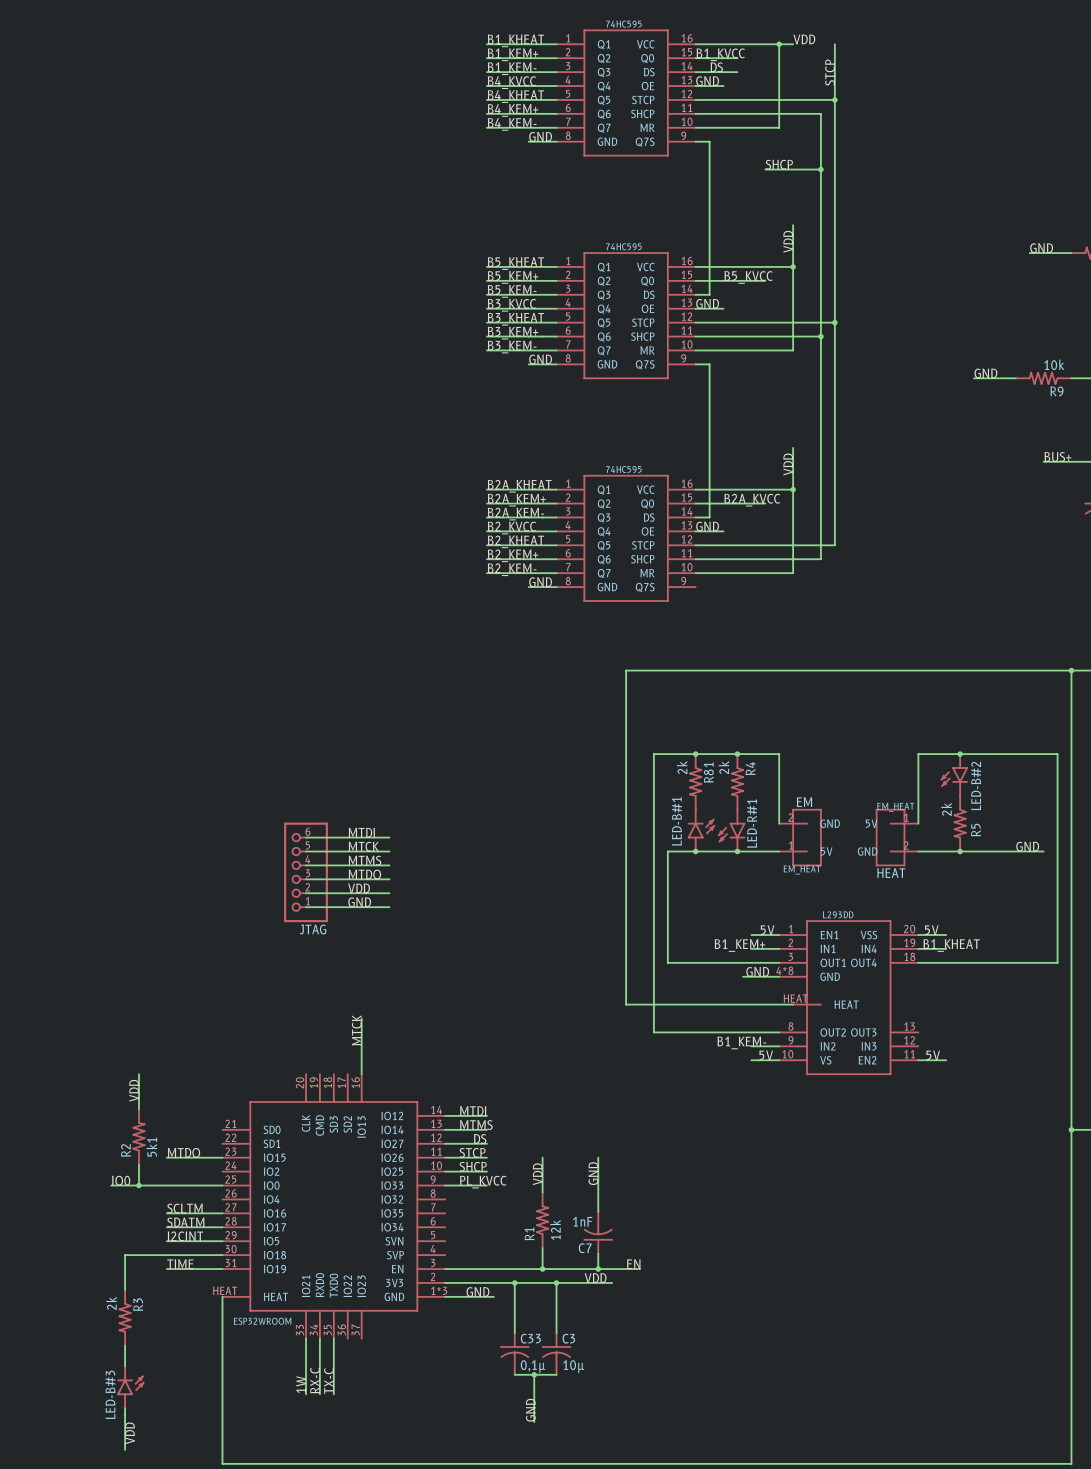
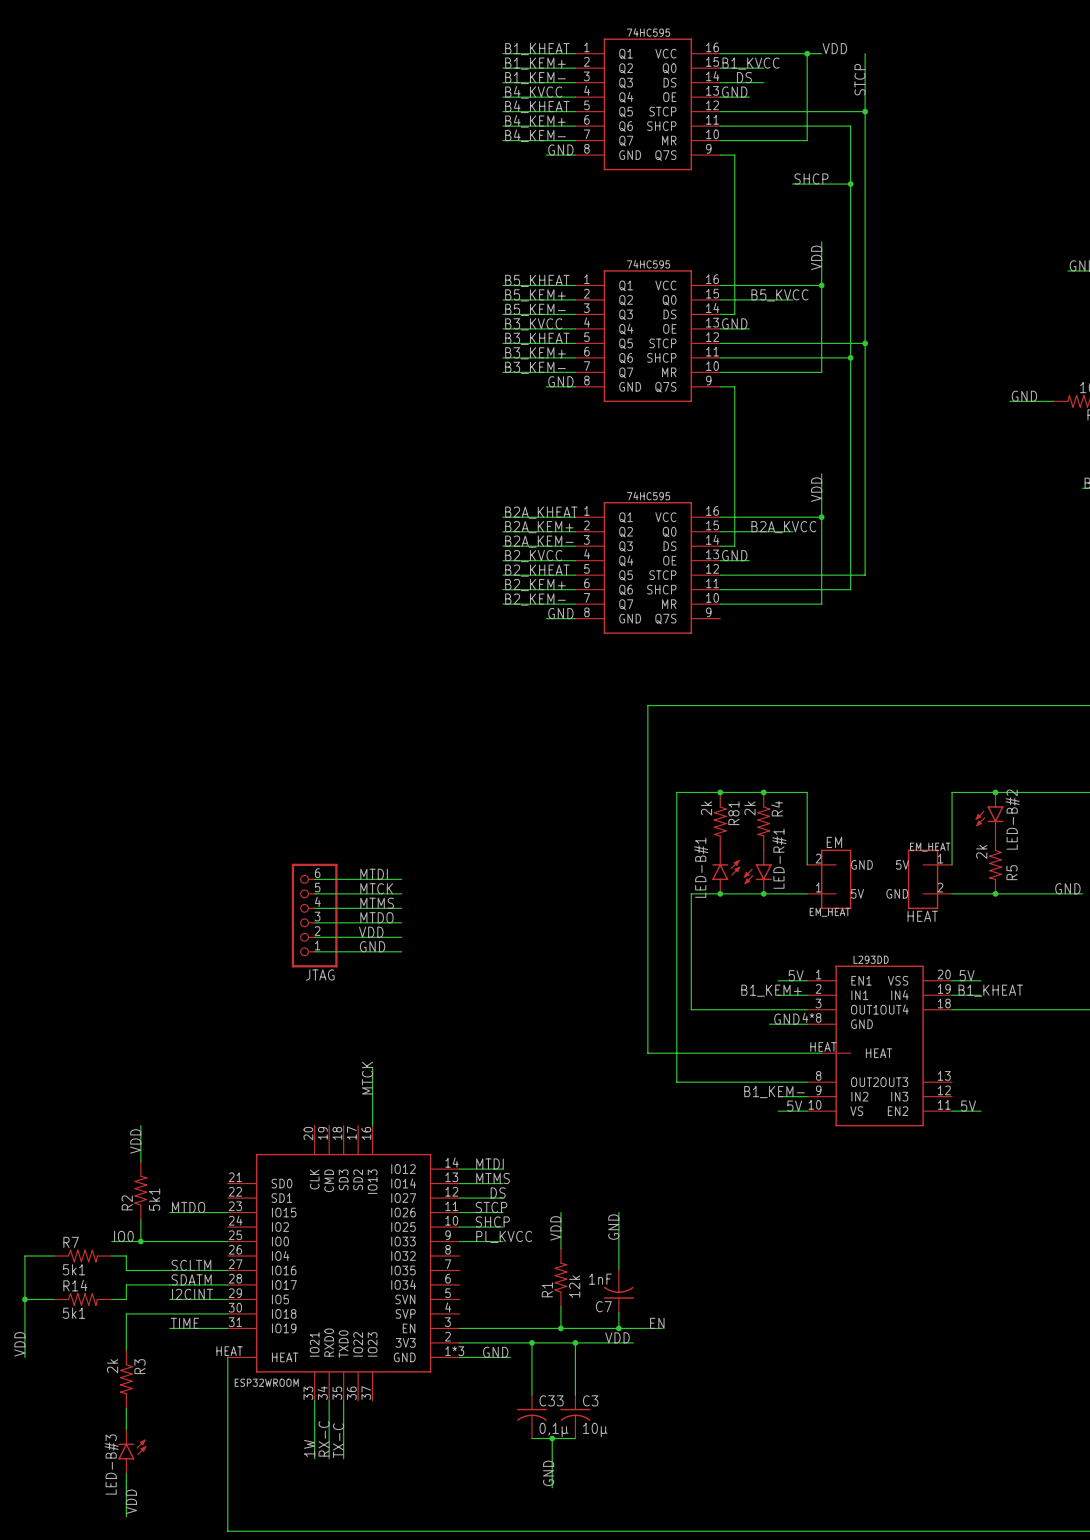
wire: none -> (53, 1256) (24, 1256) (24, 1357)
R7: none -> 5k1 (82, 1256)
wire: none -> (111, 1256) (126, 1256) (126, 1270) (169, 1270)
wire: none -> (169, 1284) (126, 1284) (126, 1299) (111, 1299)
wire: none -> (24, 1299) (53, 1299)
junction: none -> (24, 1299)
R14: none -> 5k1 (82, 1299)
label: none -> VDD (19, 1344)

